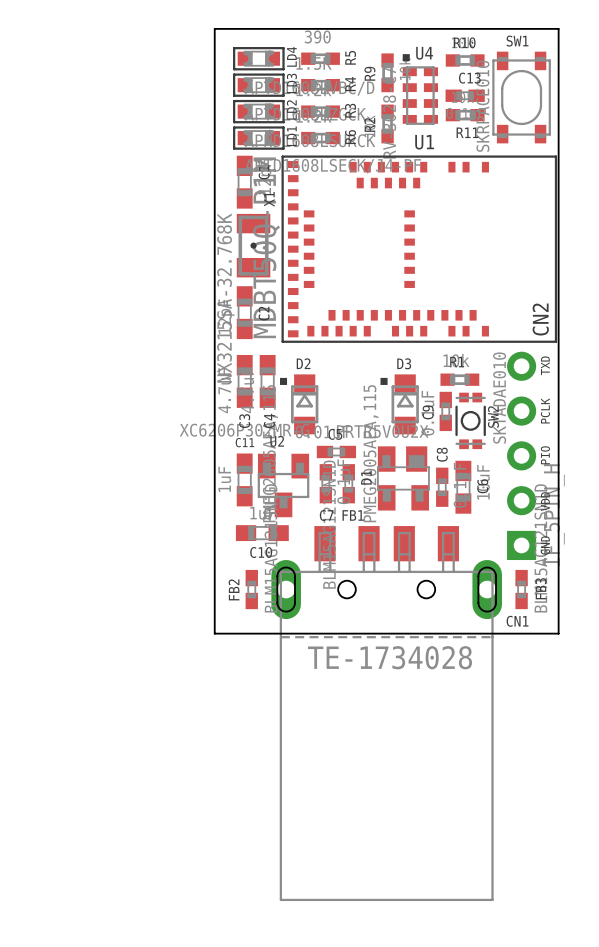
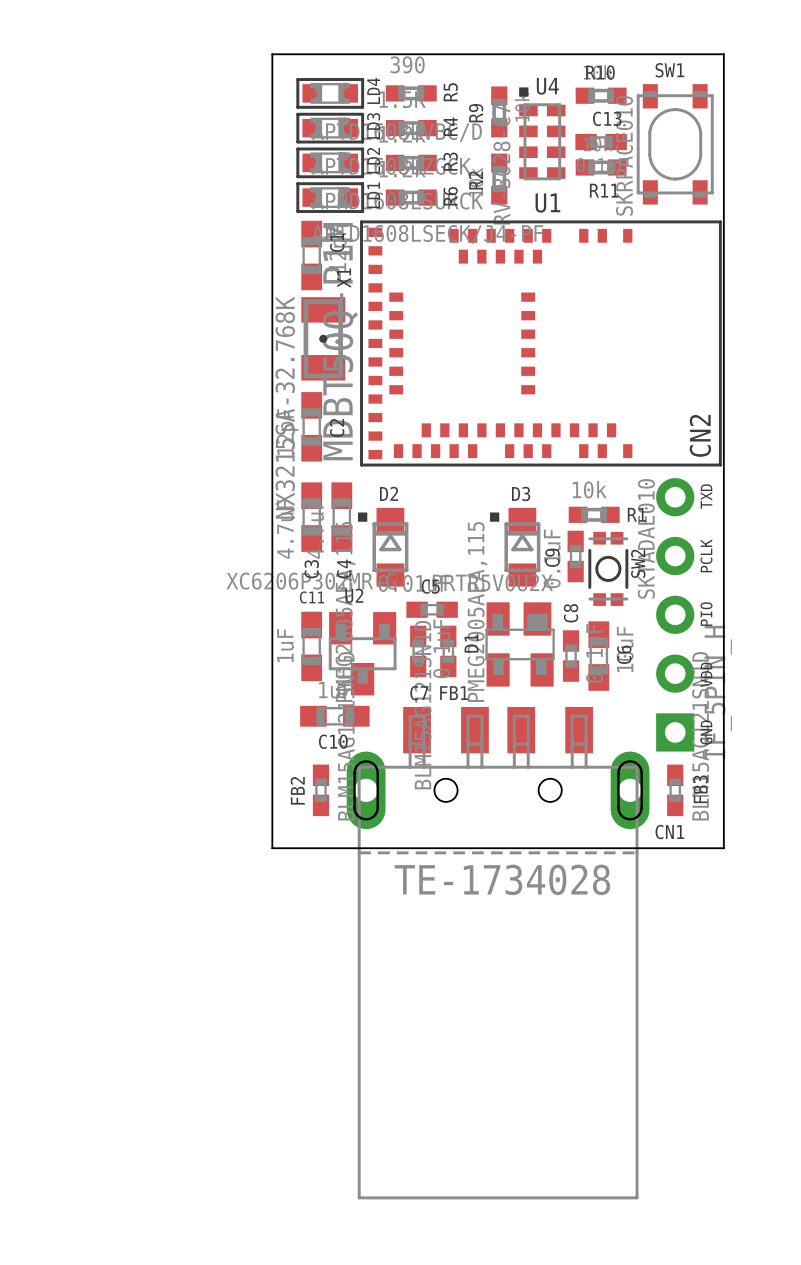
R1 name position: R1 (457, 362) -> R1 (636, 514)

